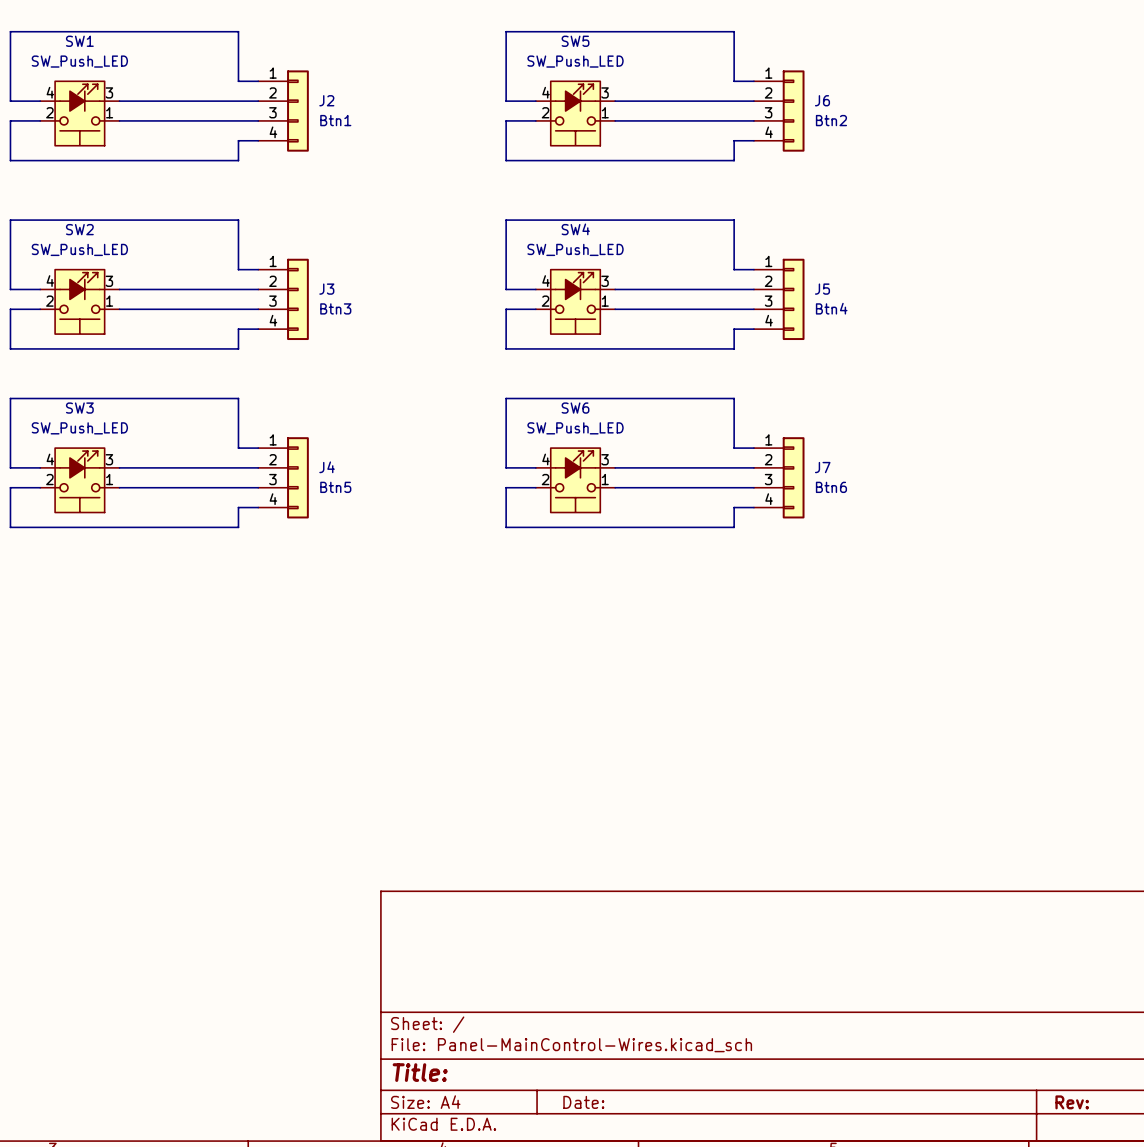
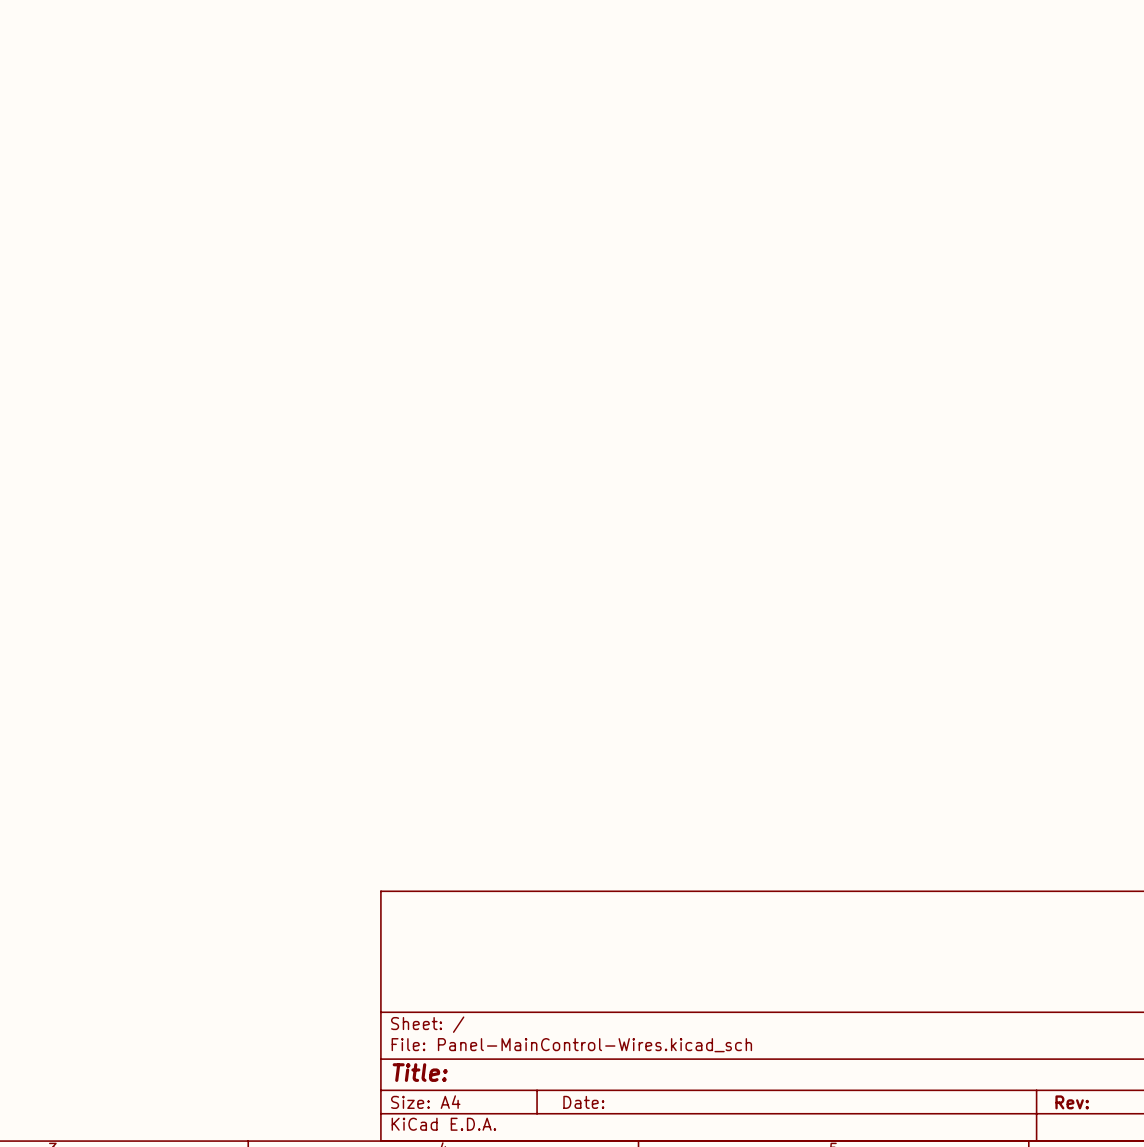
wire: (258, 81) (238, 81) (238, 31) (10, 31) (10, 101) (40, 101) -> none
wire: (753, 81) (734, 81) (734, 31) (506, 31) (506, 101) (535, 101) -> none
wire: (119, 101) (258, 101) -> none
wire: (615, 101) (753, 101) -> none
J2: Btn1 (283, 111) -> none
J6: Btn2 (779, 111) -> none
SW1: SW_Push_LED (79, 113) -> none
SW5: SW_Push_LED (575, 113) -> none
wire: (40, 120) (10, 120) (10, 160) (238, 160) (238, 140) (258, 140) -> none
wire: (119, 120) (258, 120) -> none
wire: (535, 120) (506, 120) (506, 160) (734, 160) (734, 140) (753, 140) -> none
wire: (615, 120) (753, 120) -> none
wire: (258, 269) (238, 269) (238, 220) (10, 220) (10, 289) (40, 289) -> none
wire: (753, 269) (734, 269) (734, 220) (506, 220) (506, 289) (535, 289) -> none
wire: (119, 289) (258, 289) -> none
wire: (615, 289) (753, 289) -> none
J3: Btn3 (283, 299) -> none
J5: Btn4 (779, 299) -> none
SW2: SW_Push_LED (79, 301) -> none
SW4: SW_Push_LED (575, 301) -> none
wire: (40, 309) (10, 309) (10, 348) (238, 348) (238, 329) (258, 329) -> none
wire: (119, 309) (258, 309) -> none
wire: (535, 309) (506, 309) (506, 348) (734, 348) (734, 329) (753, 329) -> none
wire: (615, 309) (753, 309) -> none
wire: (258, 448) (238, 448) (238, 398) (10, 398) (10, 467) (40, 467) -> none
wire: (753, 448) (734, 448) (734, 398) (506, 398) (506, 467) (535, 467) -> none
wire: (119, 467) (258, 467) -> none
wire: (615, 467) (753, 467) -> none
J4: Btn5 (283, 477) -> none
J7: Btn6 (779, 477) -> none
SW3: SW_Push_LED (79, 480) -> none
SW6: SW_Push_LED (575, 480) -> none
wire: (40, 487) (10, 487) (10, 527) (238, 527) (238, 507) (258, 507) -> none
wire: (119, 487) (258, 487) -> none
wire: (535, 487) (506, 487) (506, 527) (734, 527) (734, 507) (753, 507) -> none
wire: (615, 487) (753, 487) -> none

